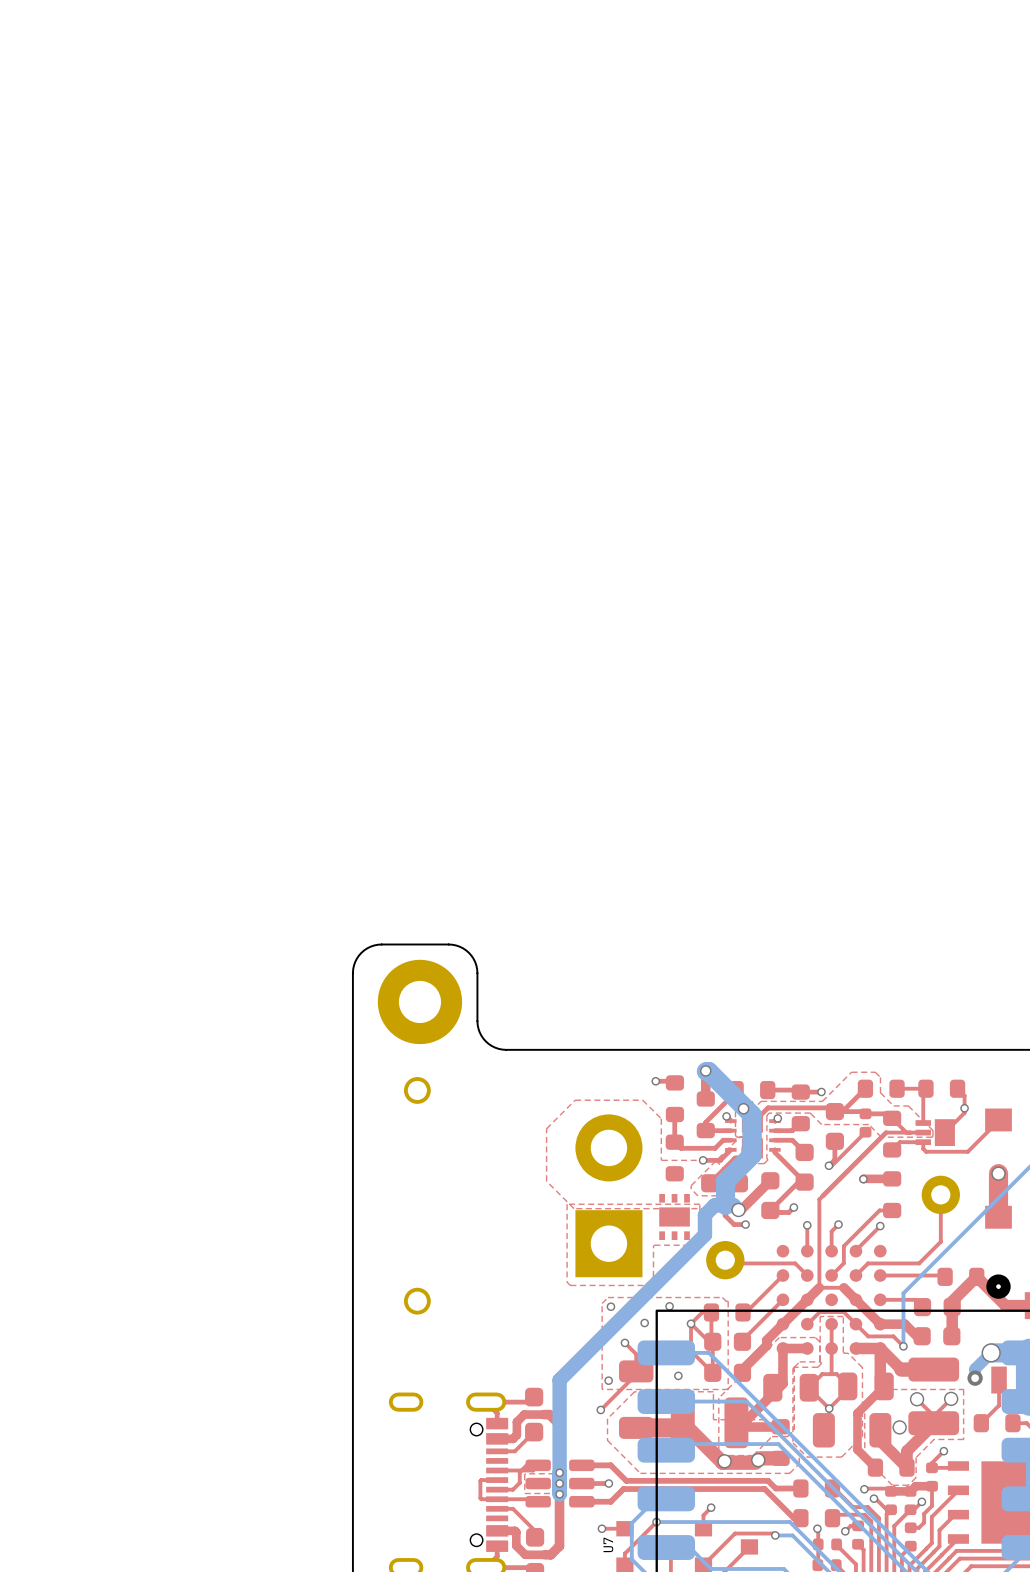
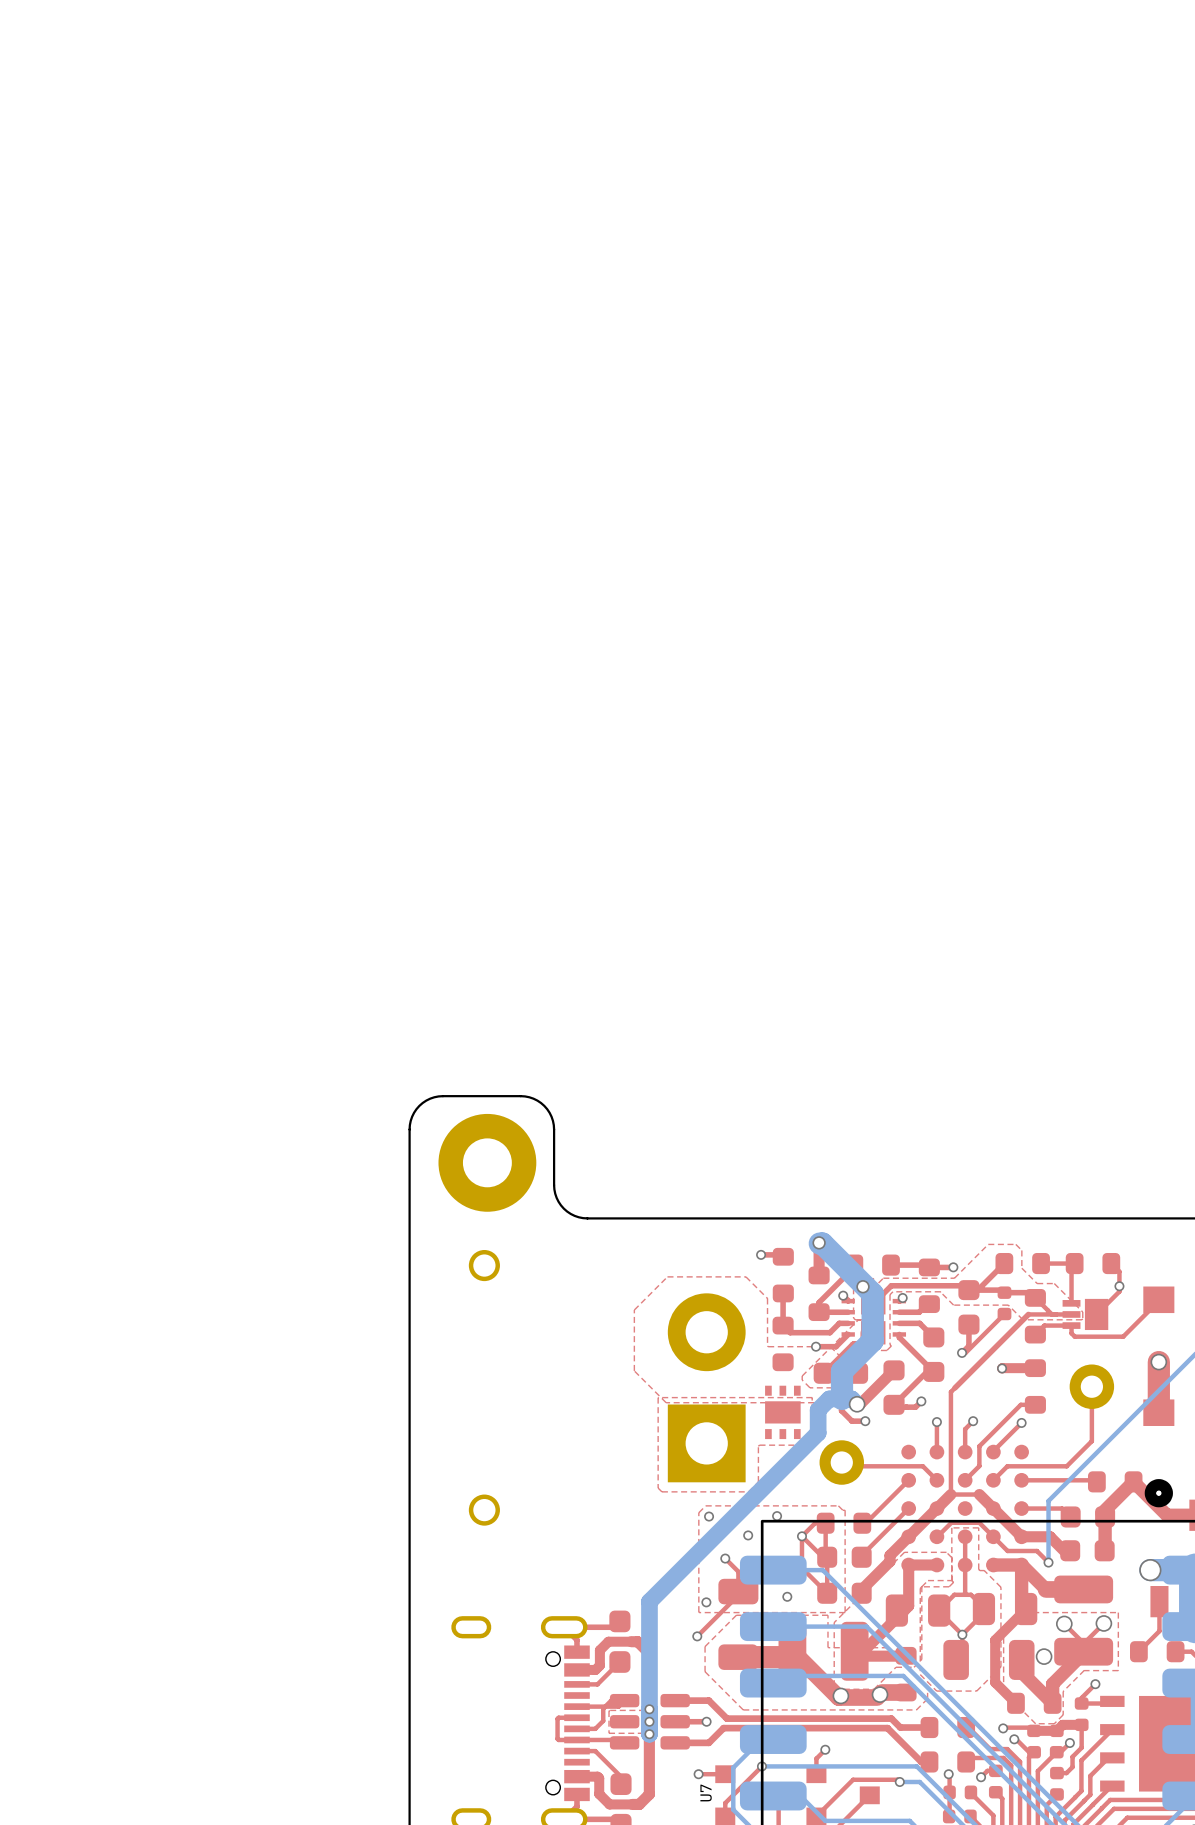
bottom track: (991, 1352) (975, 1368) (975, 1378) -> none
via: (975, 1378) -> none

